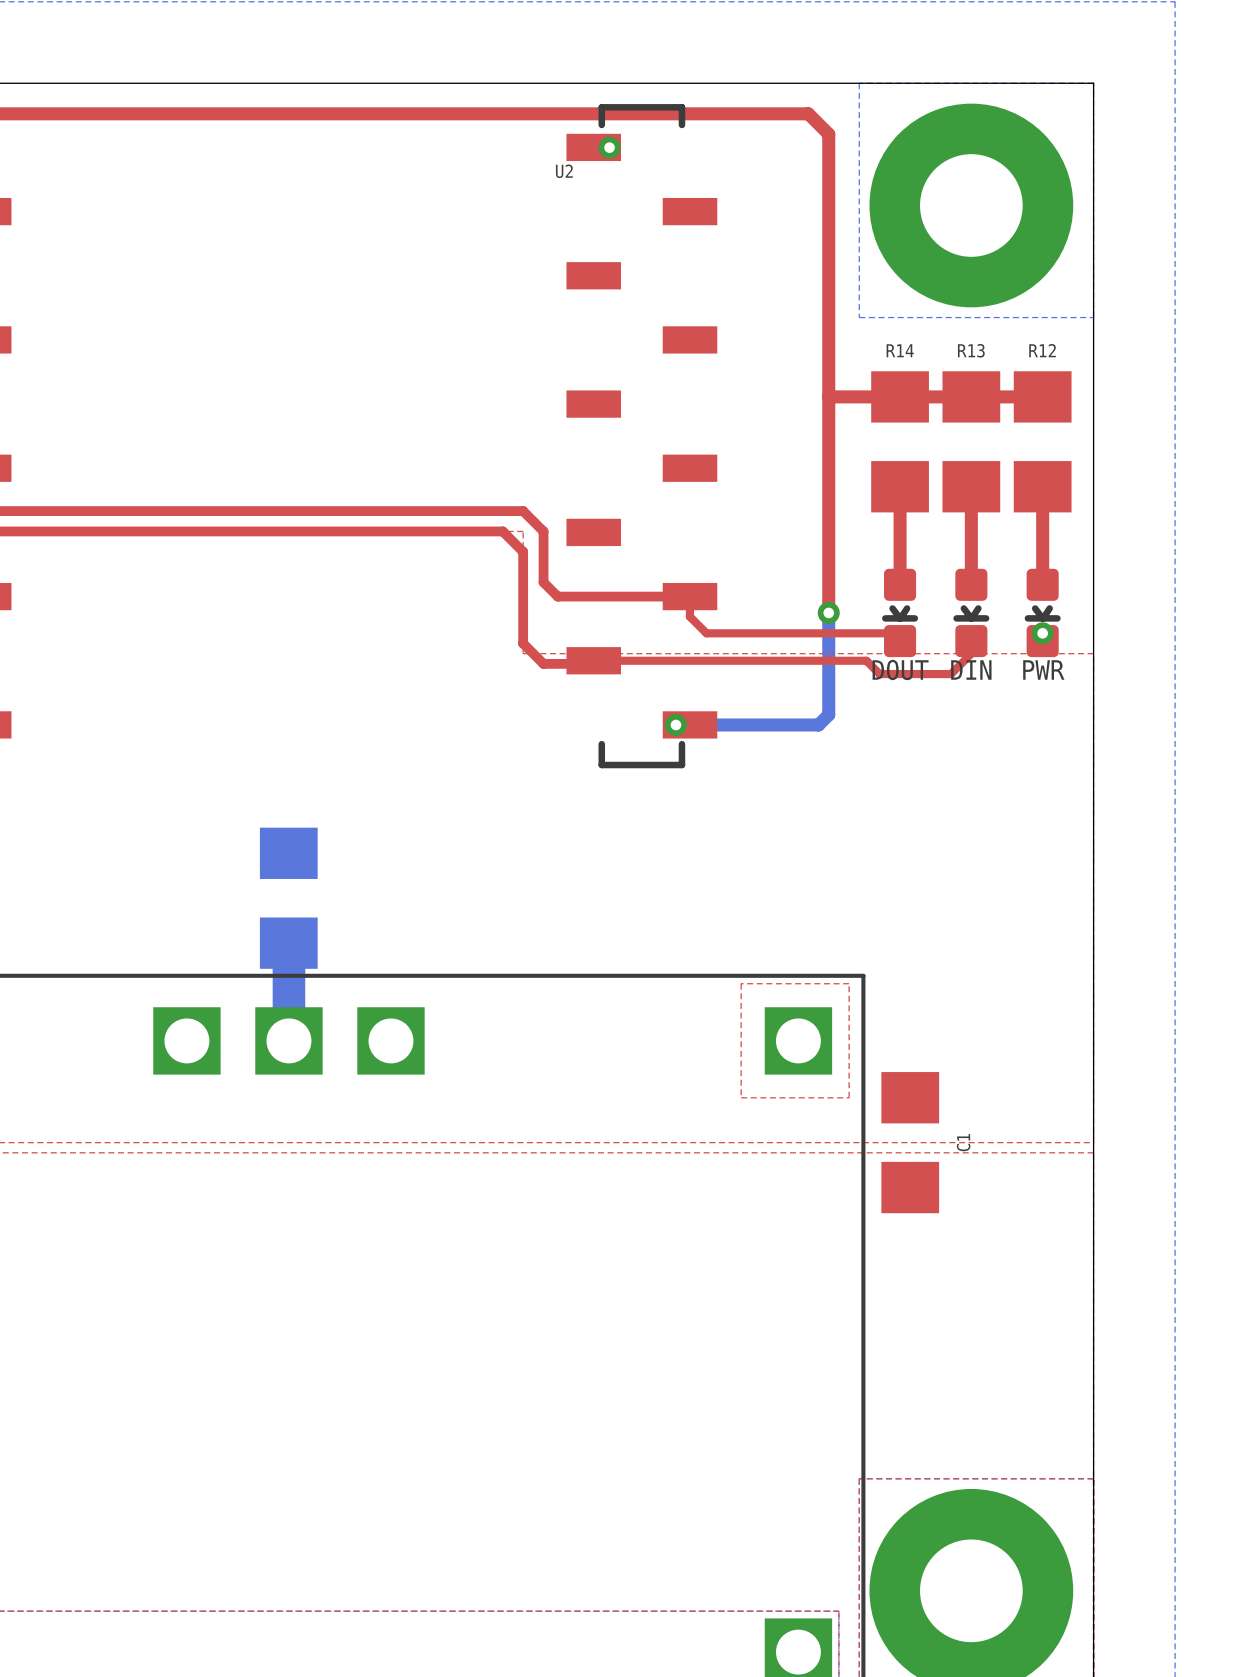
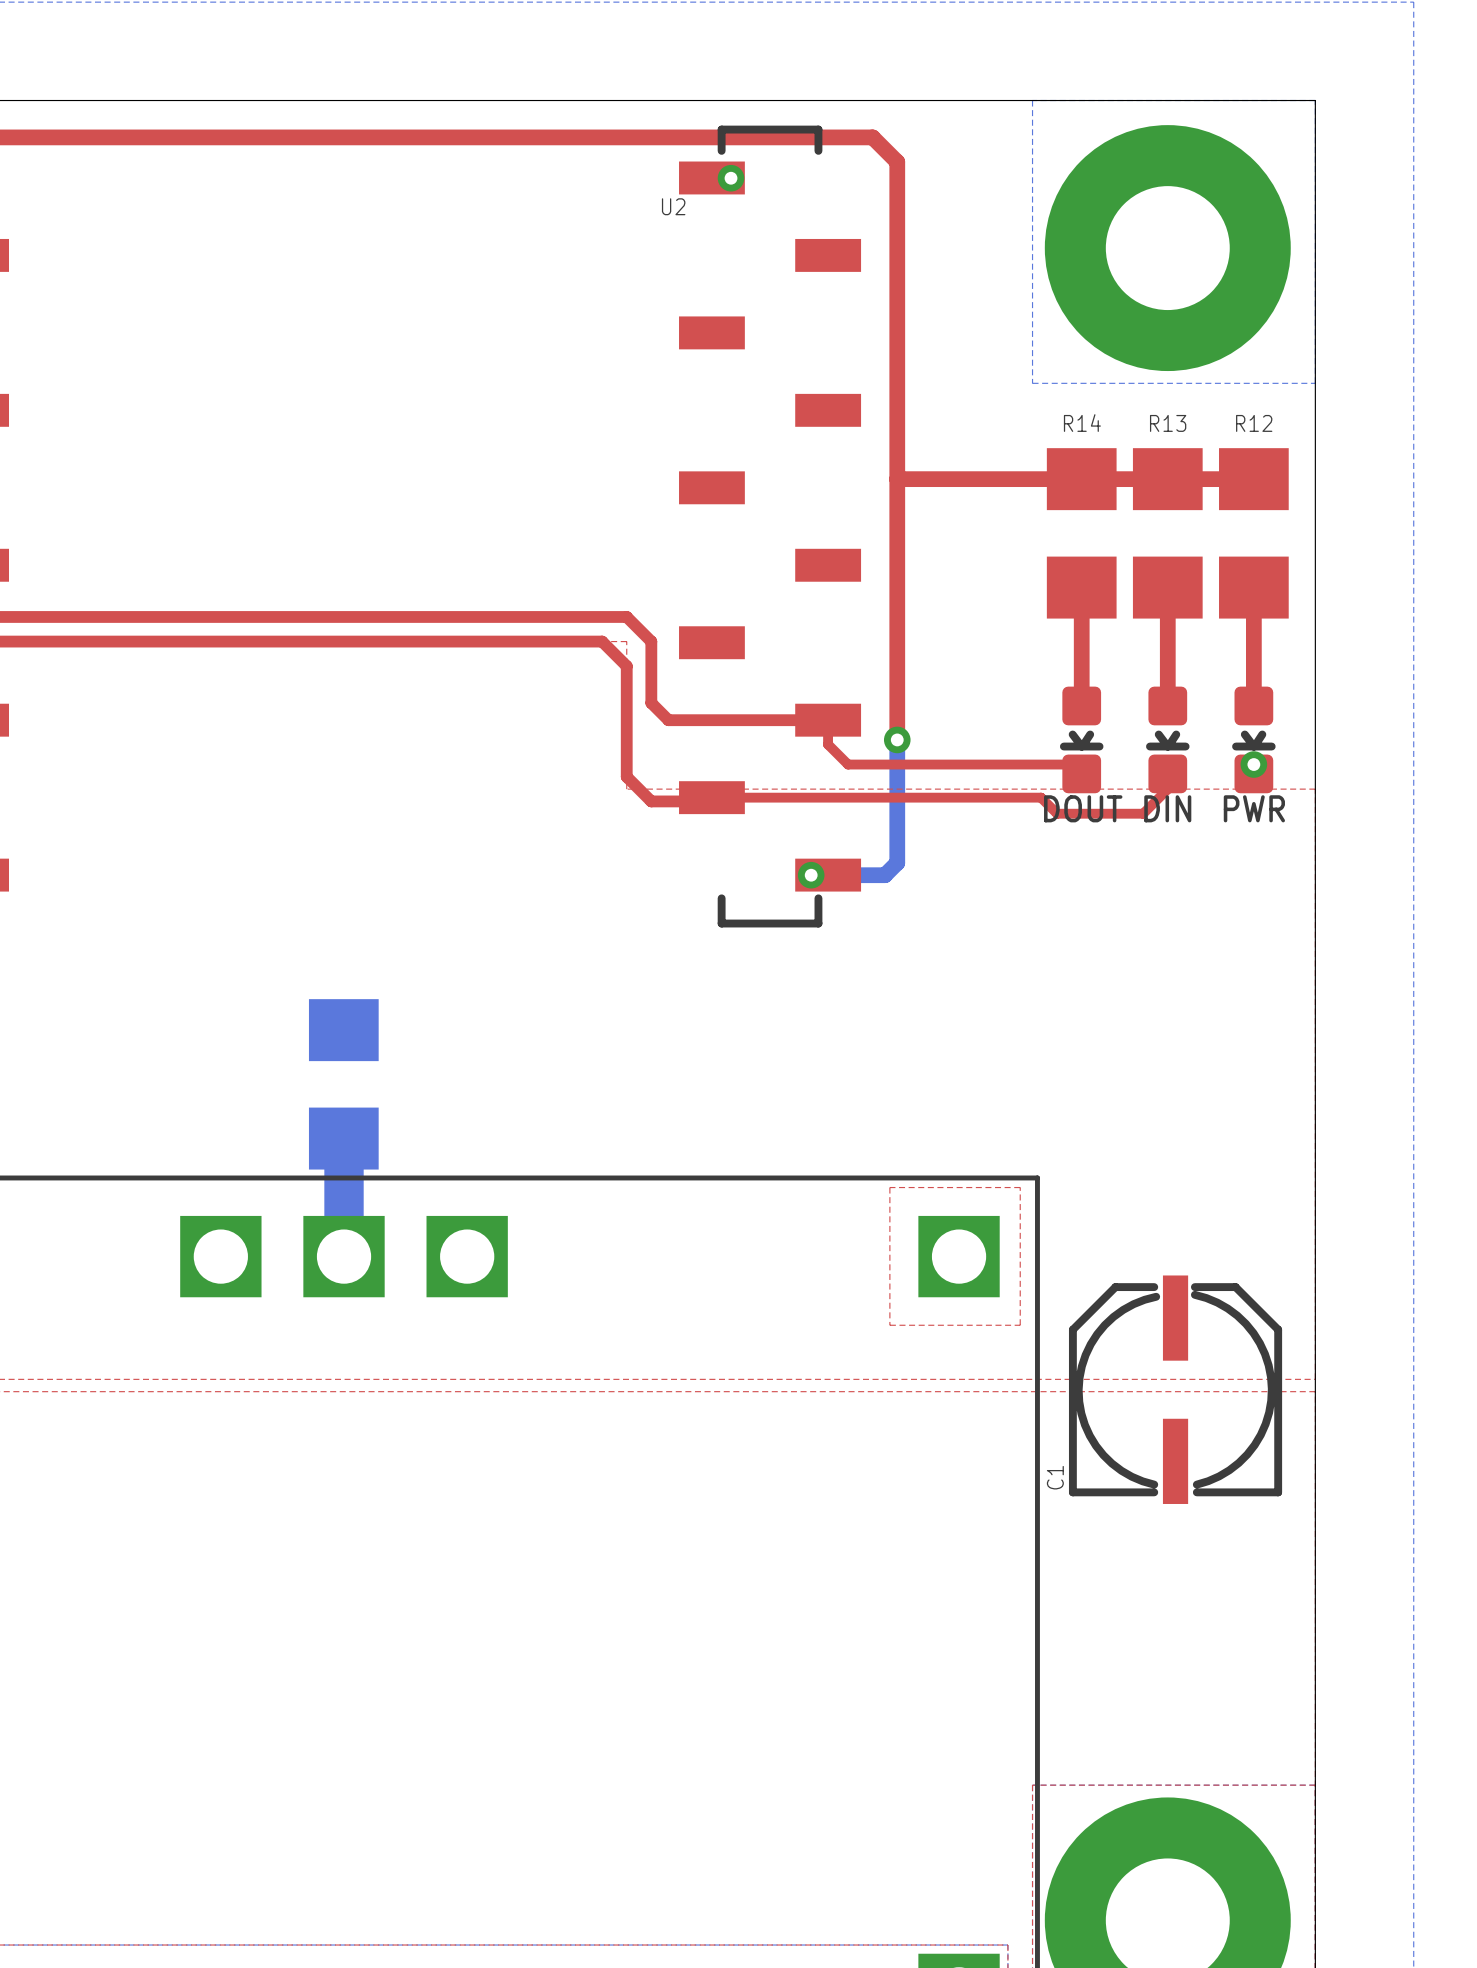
top track: (726, 113) (808, 113) (828, 134) (828, 612) -> (872, 137) (897, 162) (897, 739)
top track: none -> (897, 479) (995, 479)
bottom track: (828, 612) (828, 714) (818, 724) (737, 724) -> (897, 739) (897, 862) (884, 875)
via position: (828, 612) -> (897, 739)
C1 footprint: [881, 1072, 940, 1214] -> [1068, 1275, 1283, 1504]
C1 name position: C1 (963, 1142) -> C1 (1055, 1477)

